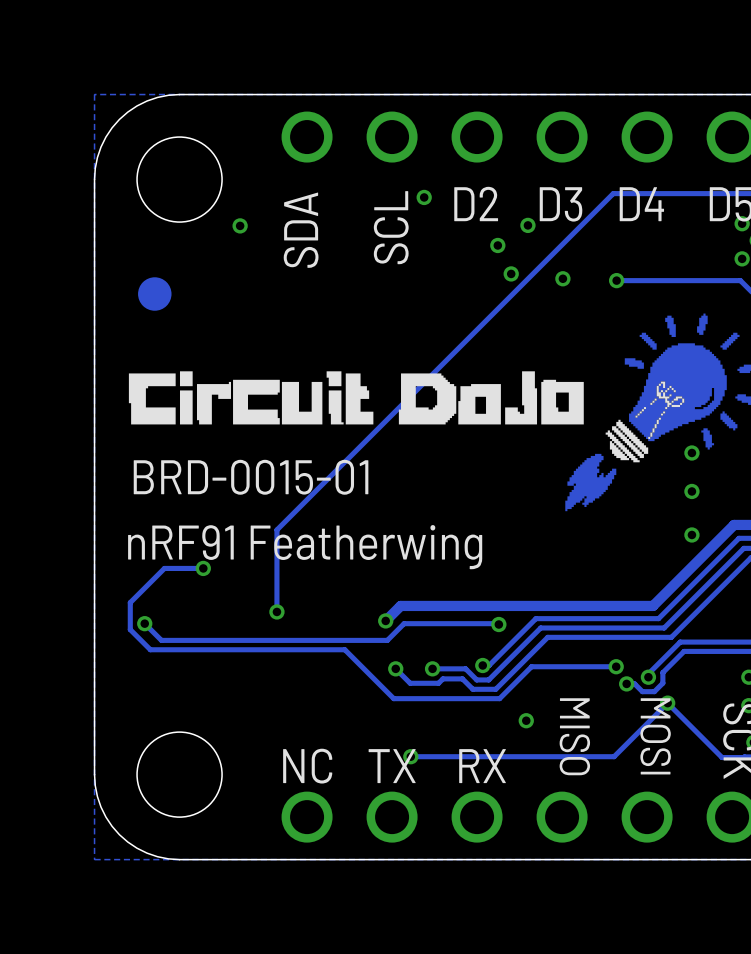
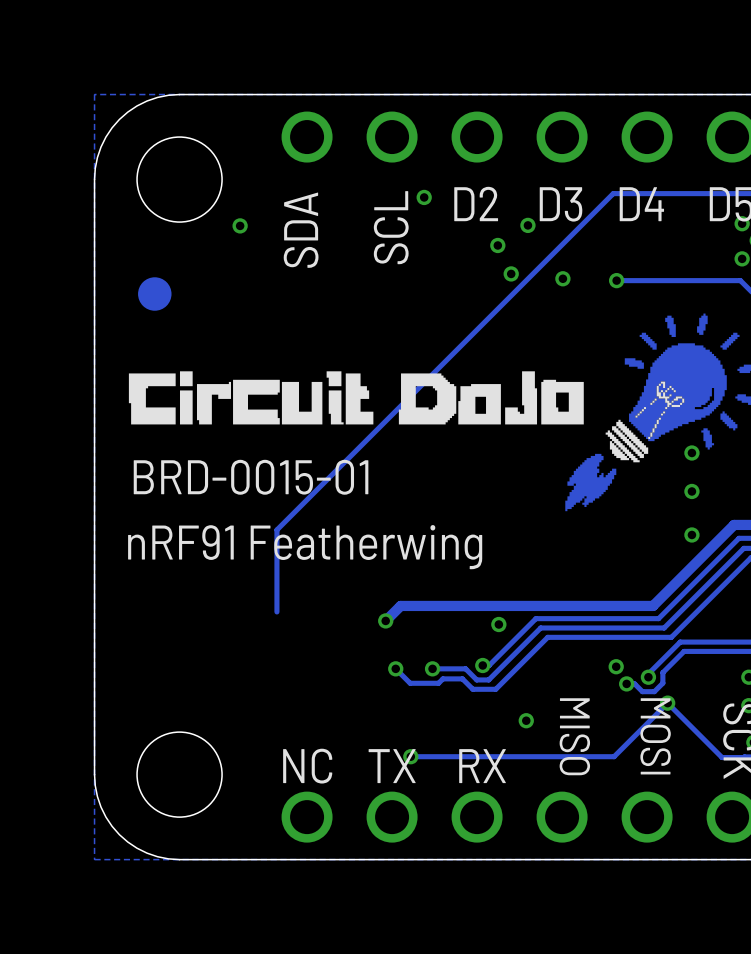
track: (203, 568) (164, 568) (130, 602) (130, 629) (150, 649) (344, 649) (393, 698) (499, 698) (531, 666) (616, 666) -> none
via: (203, 568) -> none
via: (276, 611) -> none
via: (144, 623) -> none
track: (498, 623) (404, 623) (387, 640) (161, 640) (144, 623) -> none

